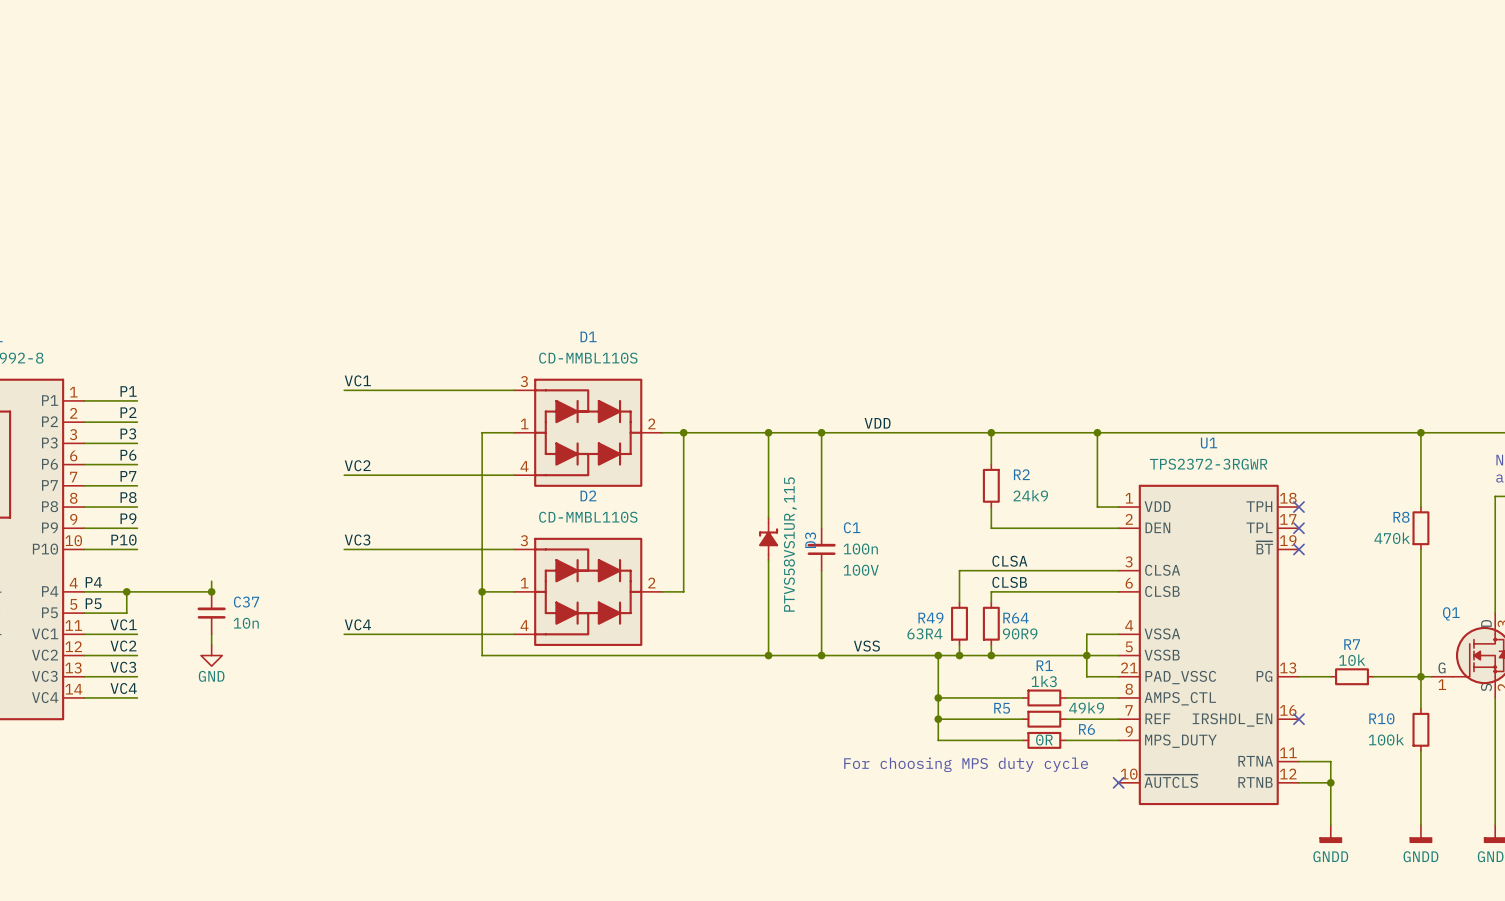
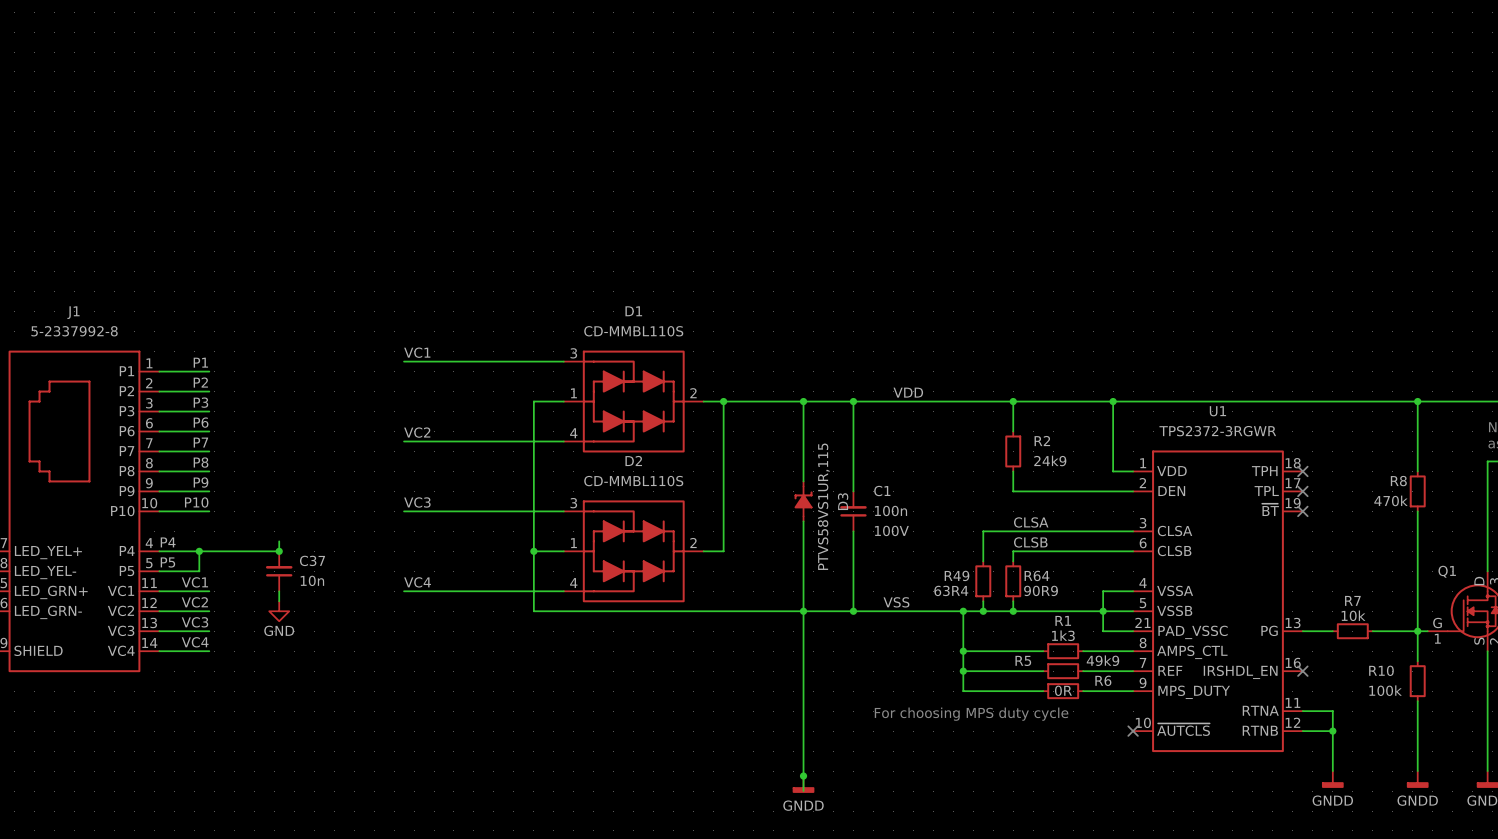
wire: none -> (803, 611) (803, 791)
junction: none -> (803, 776)
power symbol: none -> GNDD (803, 784)

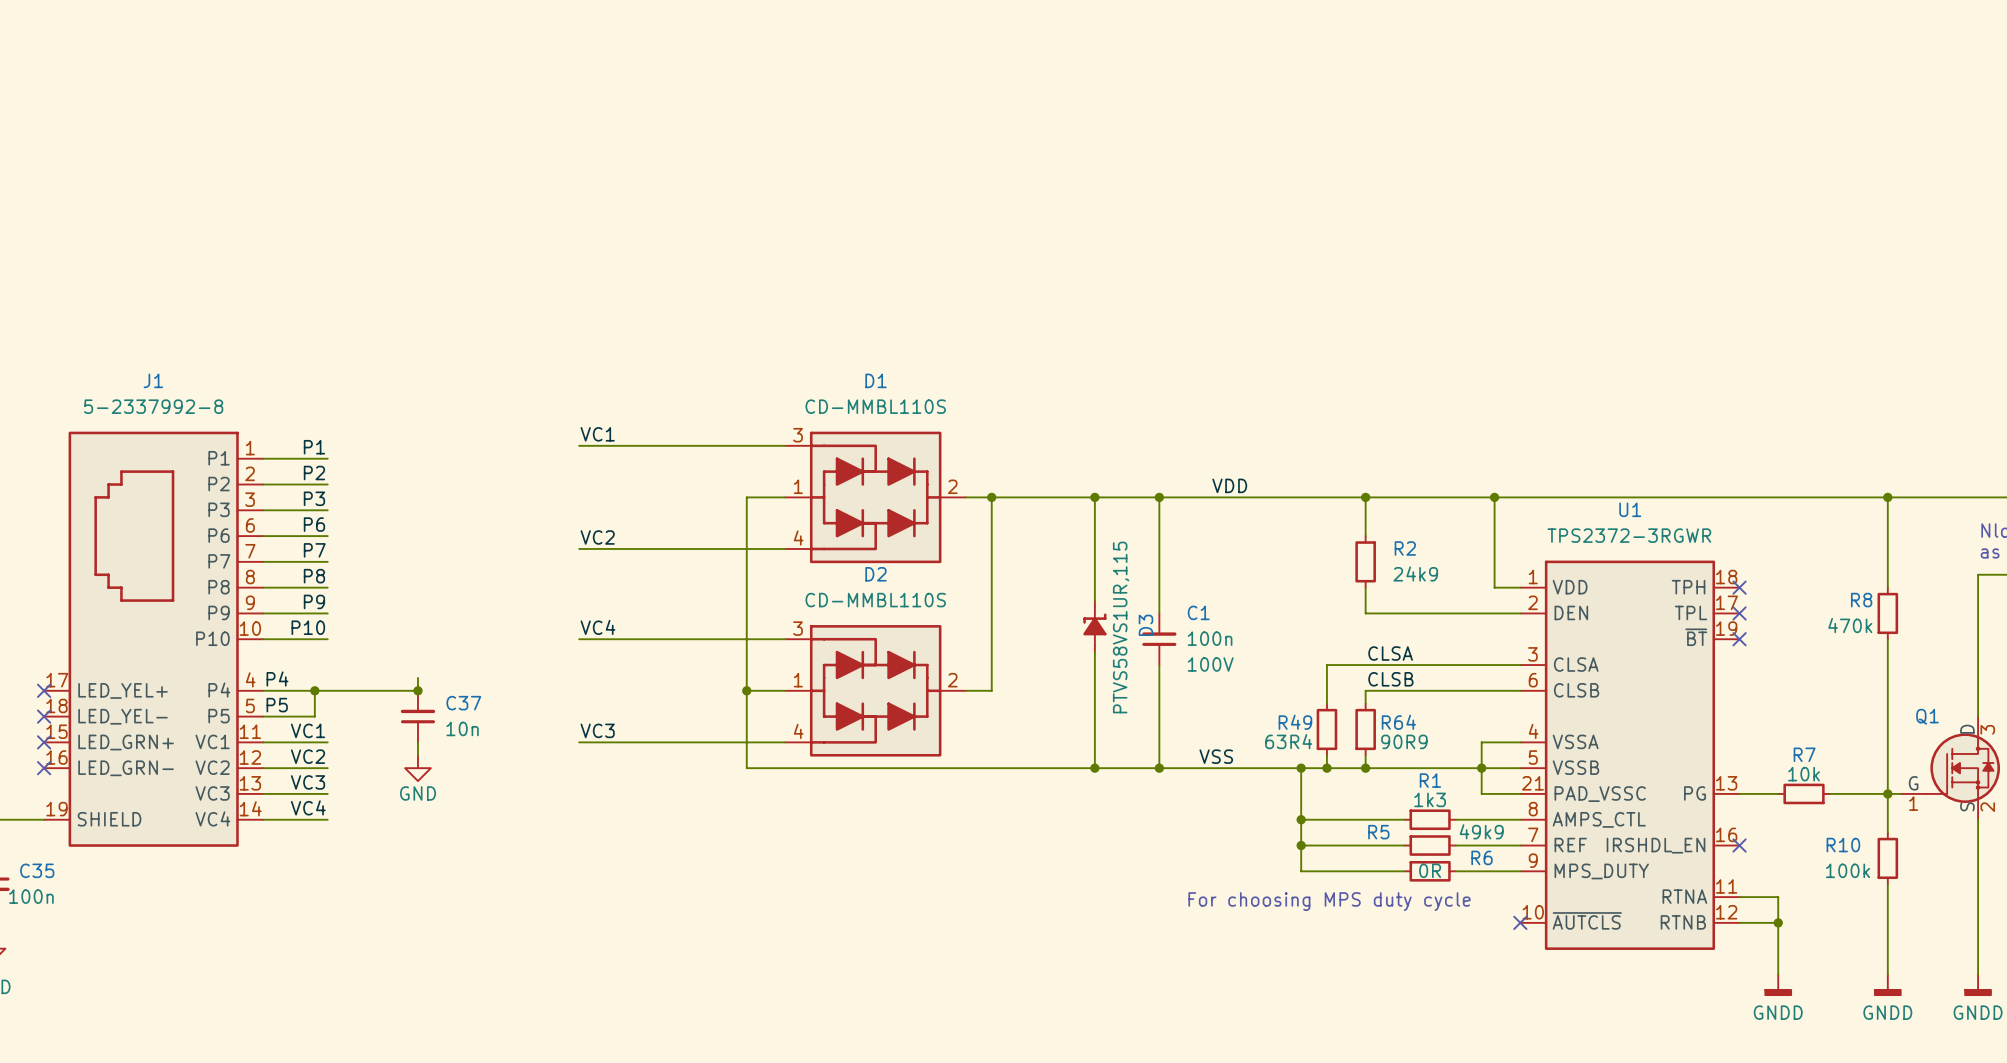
label: VC3 (417, 502) -> VC4 (597, 627)
label: VC4 (417, 582) -> VC3 (597, 730)
wire: (803, 611) (803, 791) -> none
junction: (803, 776) -> none
power symbol: GNDD (803, 784) -> none

